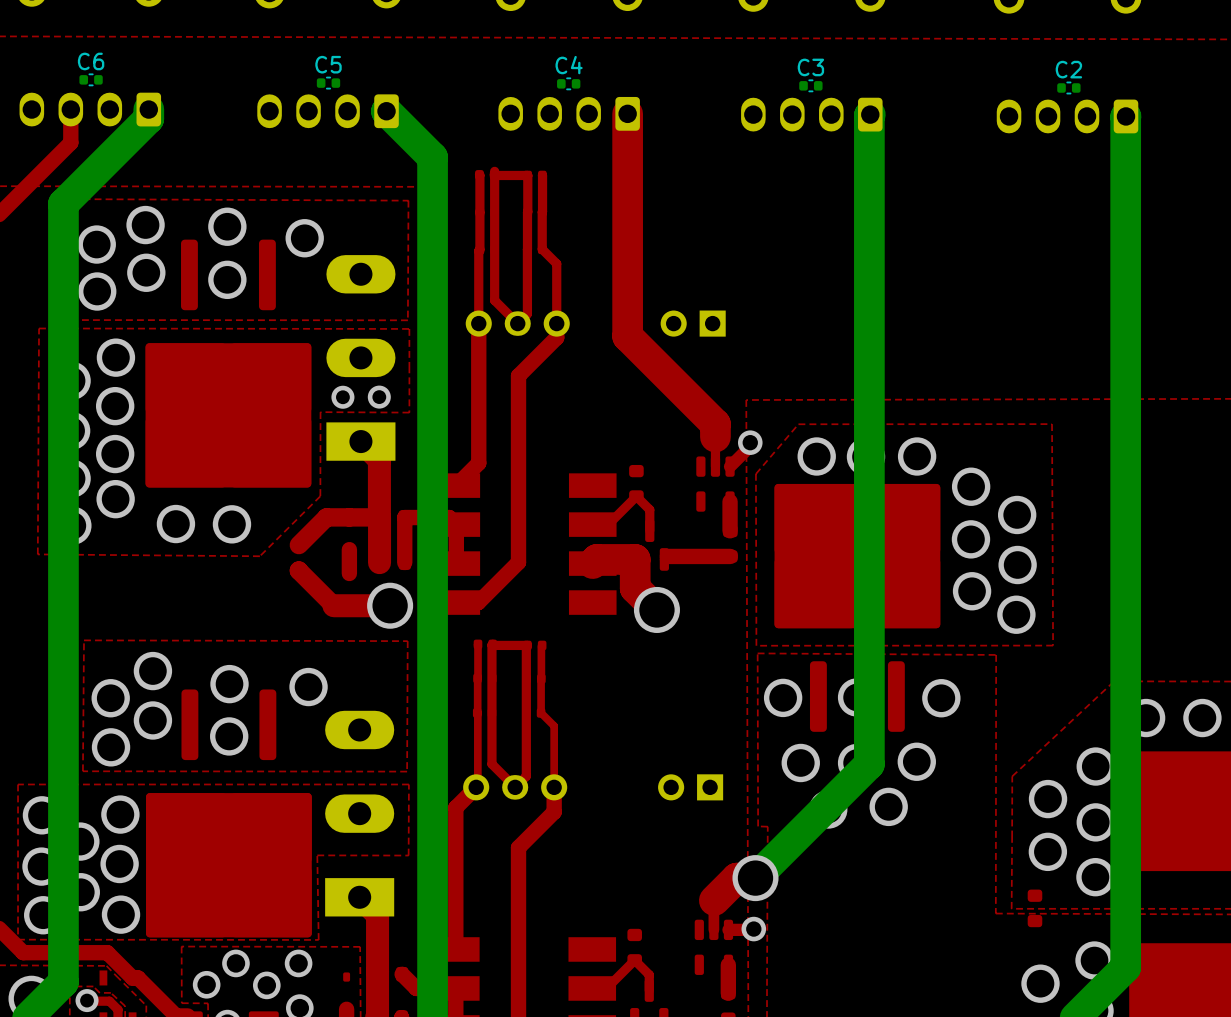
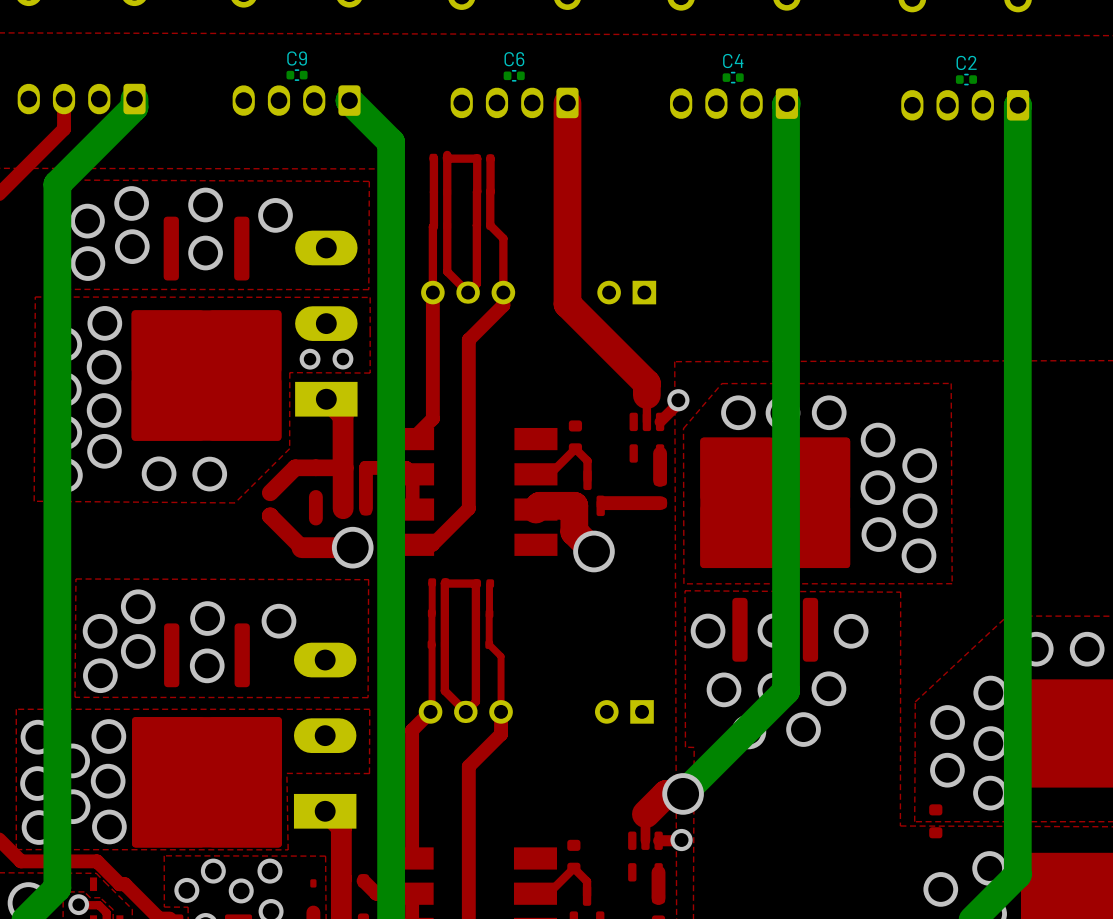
C5 name: C5 (328, 64) -> C9 (297, 58)
C4 name: C4 (569, 65) -> C6 (514, 59)
C3 name: C3 (810, 67) -> C4 (733, 61)
C6: (91, 79) -> none

